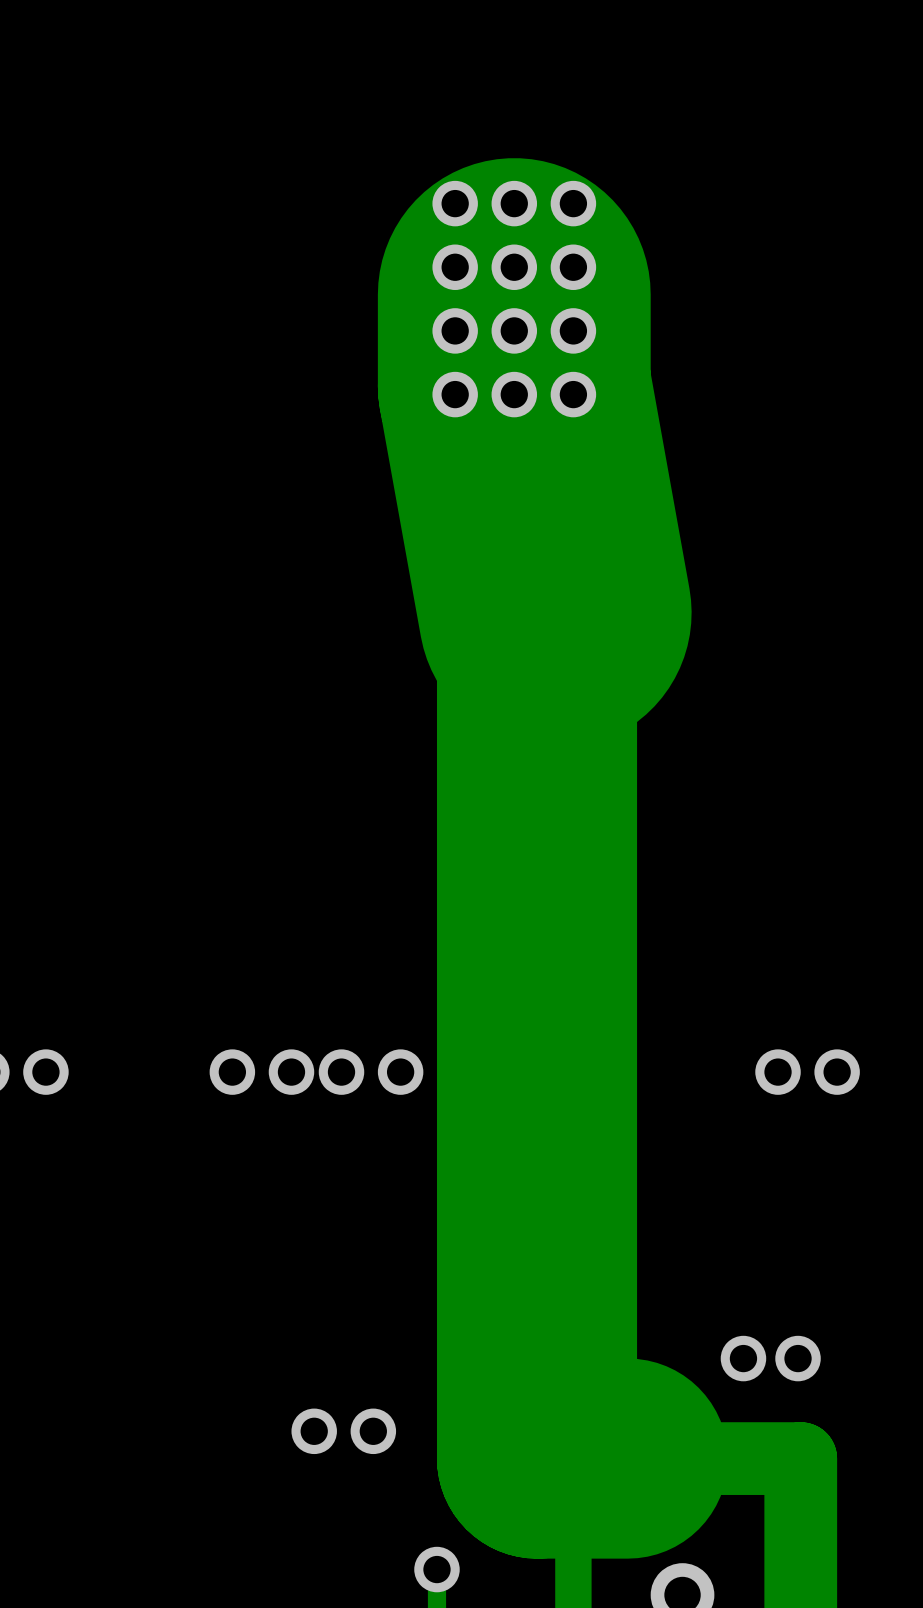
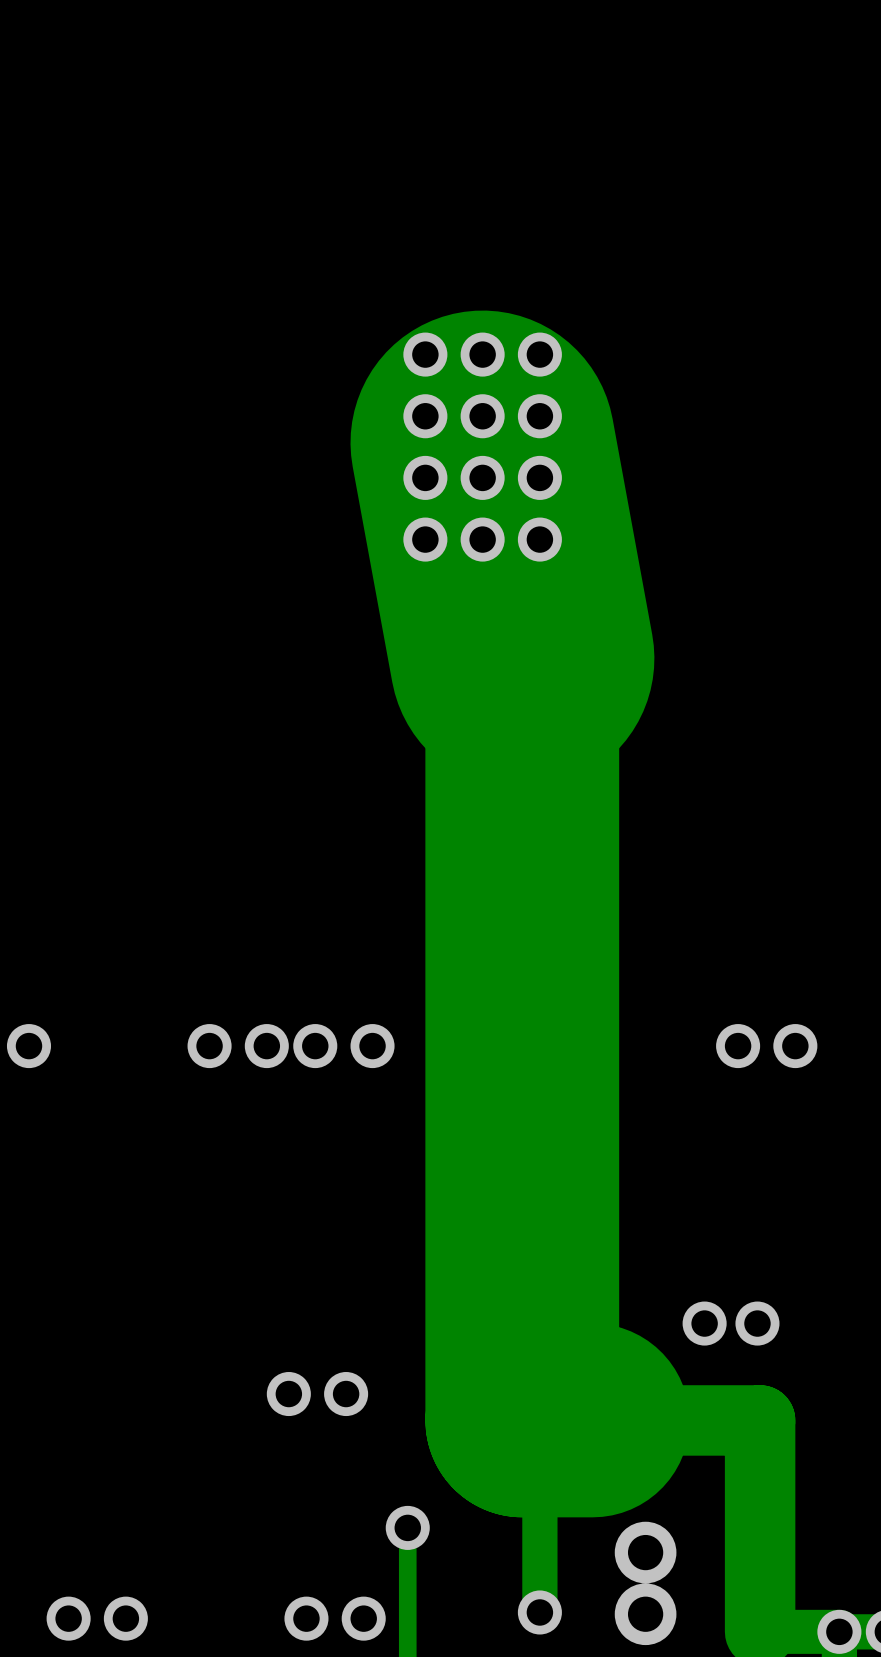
via: (455, 203) -> none
via: (514, 203) -> none
via: (573, 203) -> none
via: (455, 267) -> none
via: (514, 267) -> none
via: (573, 267) -> none
track: (514, 294) (514, 385) (555, 612) (537, 612) (537, 1458) (555, 1458) -> (482, 442) (522, 658) (522, 1420)
via: (455, 330) -> none
via: (514, 330) -> none
via: (573, 330) -> none
via: none -> (425, 354)
via: none -> (482, 354)
via: none -> (539, 354)
via: (455, 394) -> none
via: (514, 394) -> none
via: (573, 394) -> none
via: none -> (425, 416)
via: none -> (482, 416)
via: none -> (539, 416)
via: none -> (425, 477)
via: none -> (482, 477)
via: none -> (539, 477)
via: none -> (425, 539)
via: none -> (482, 539)
via: none -> (539, 539)

